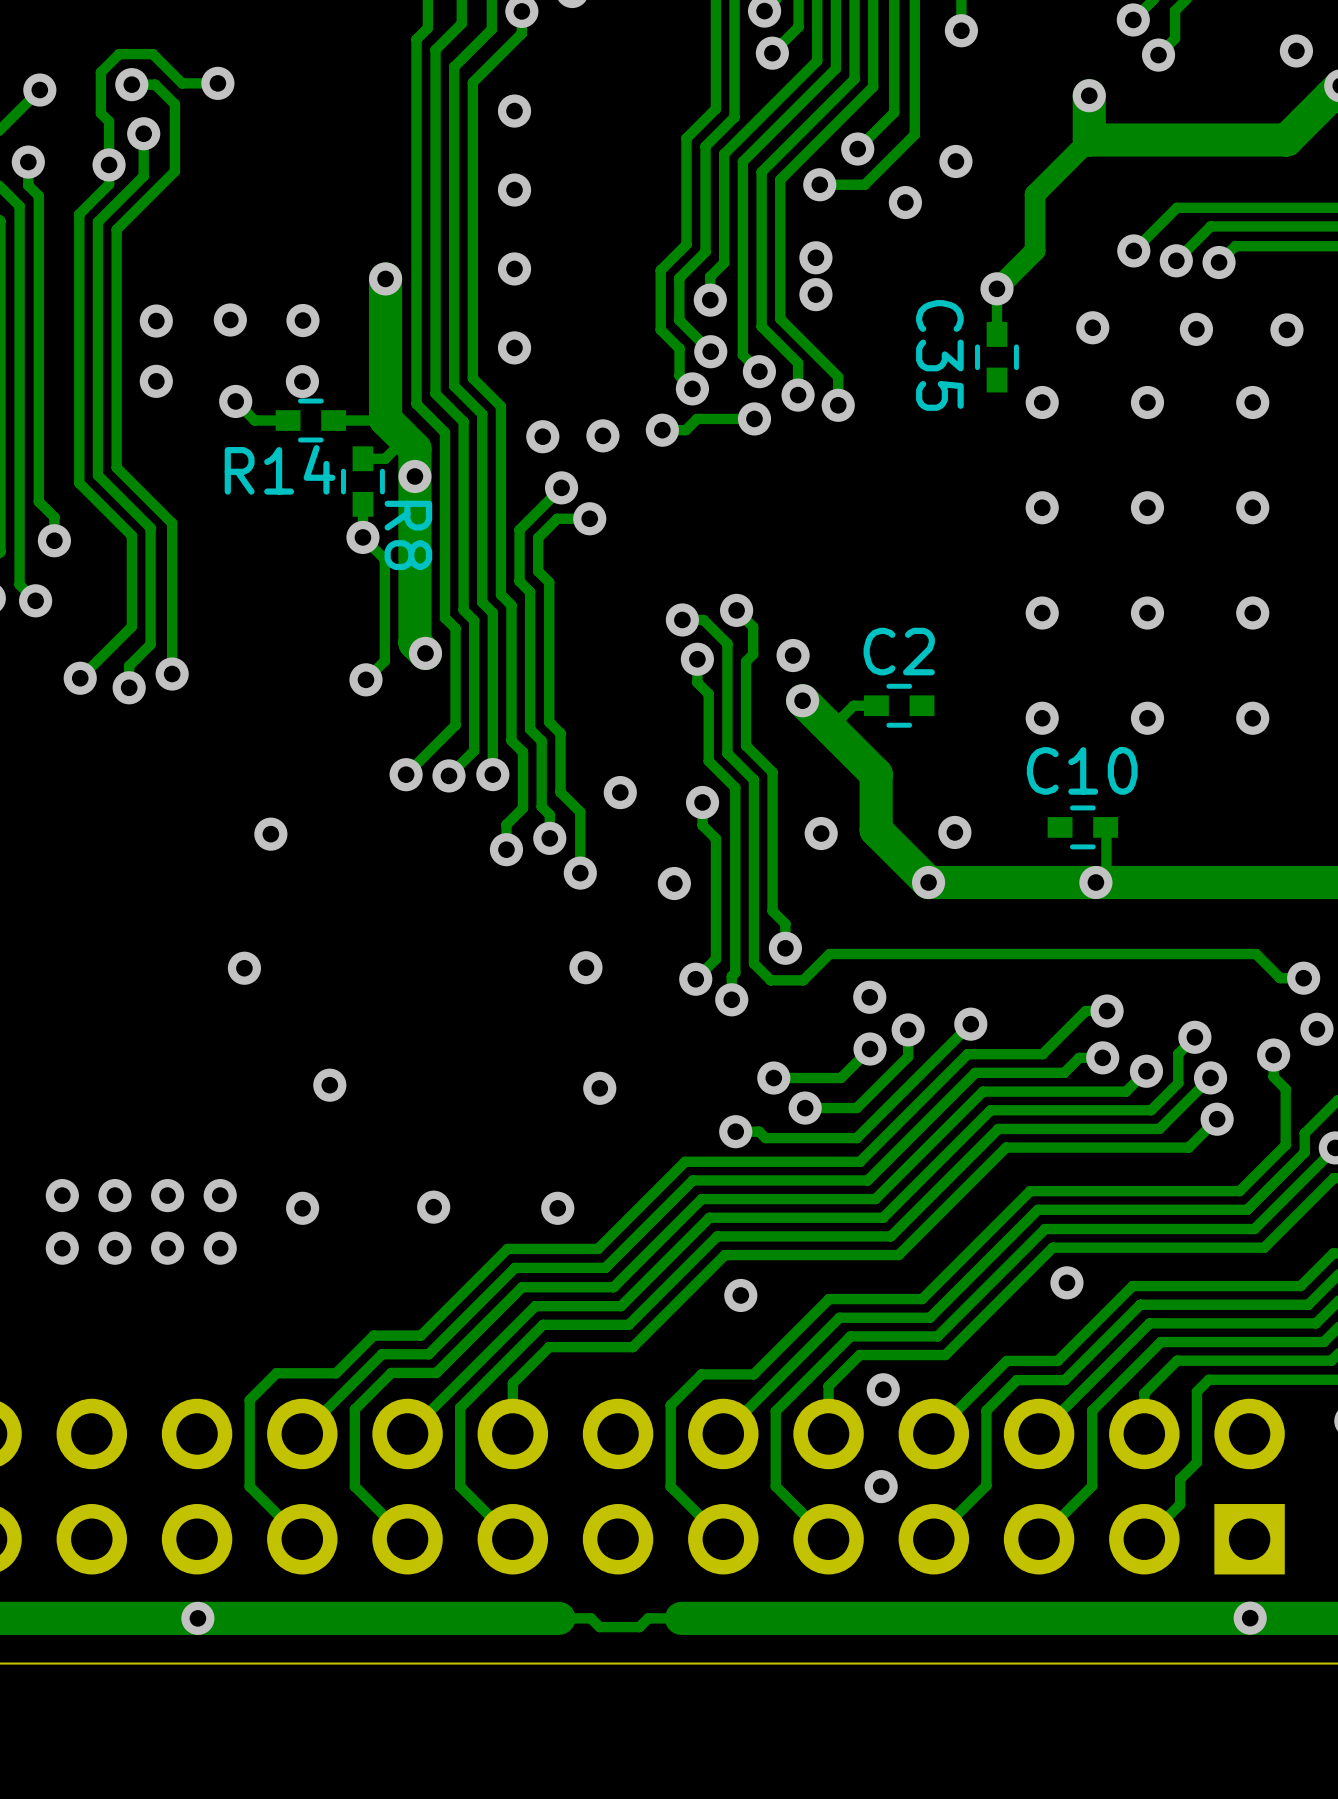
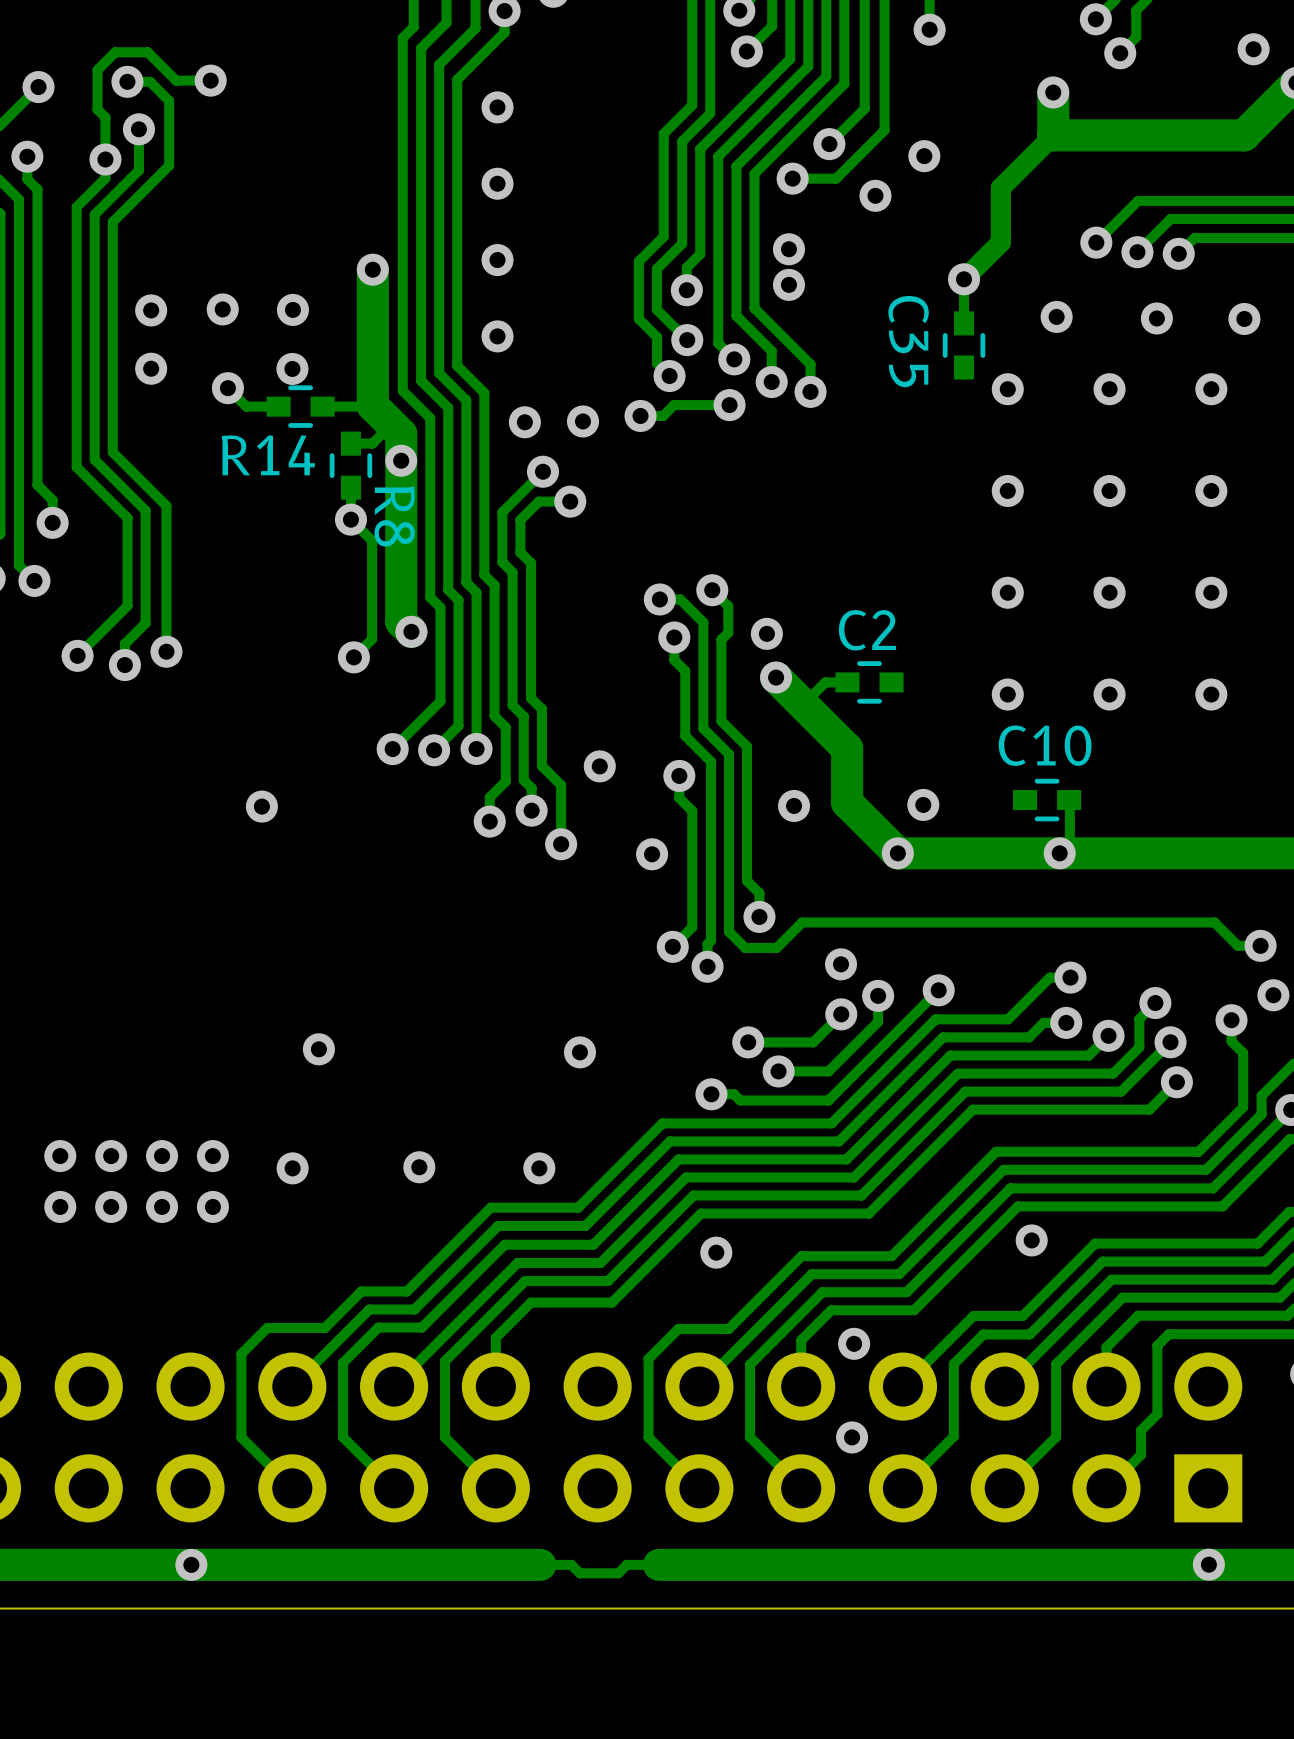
via: (585, 967) -> none
via: (244, 968) -> none

